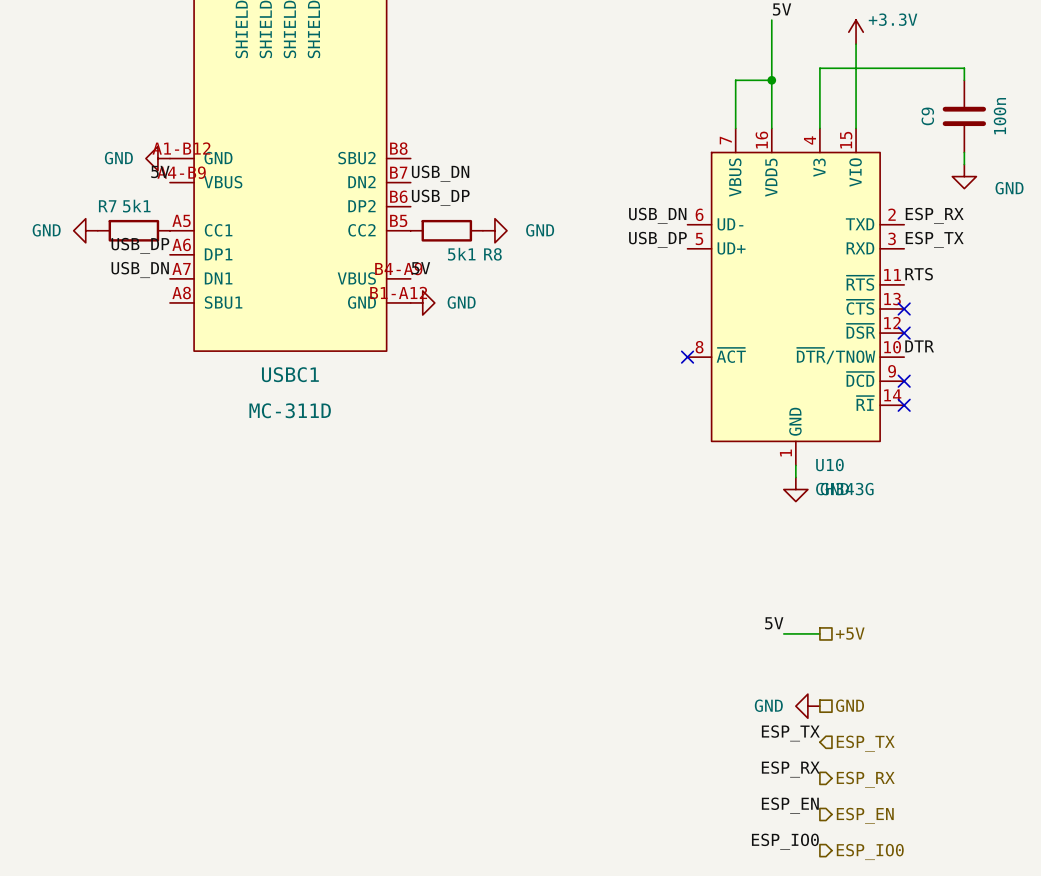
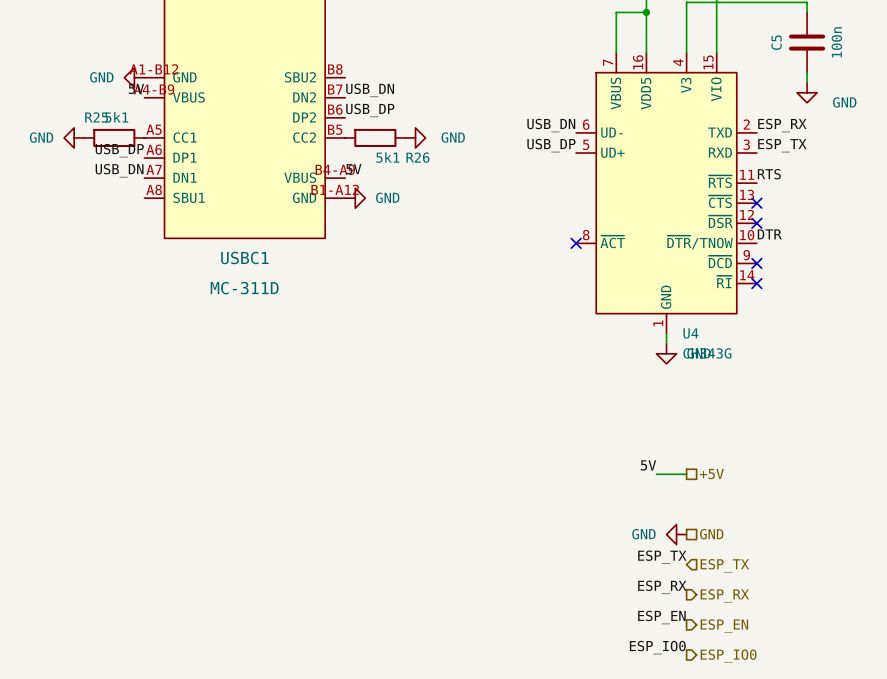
C9 name: C9 (927, 116) -> C5 (776, 42)
R7 name: R7 (107, 206) -> R25 (96, 117)
R8 name: R8 (492, 254) -> R26 (417, 157)
U10 name: U10 (829, 465) -> U4 (690, 333)

